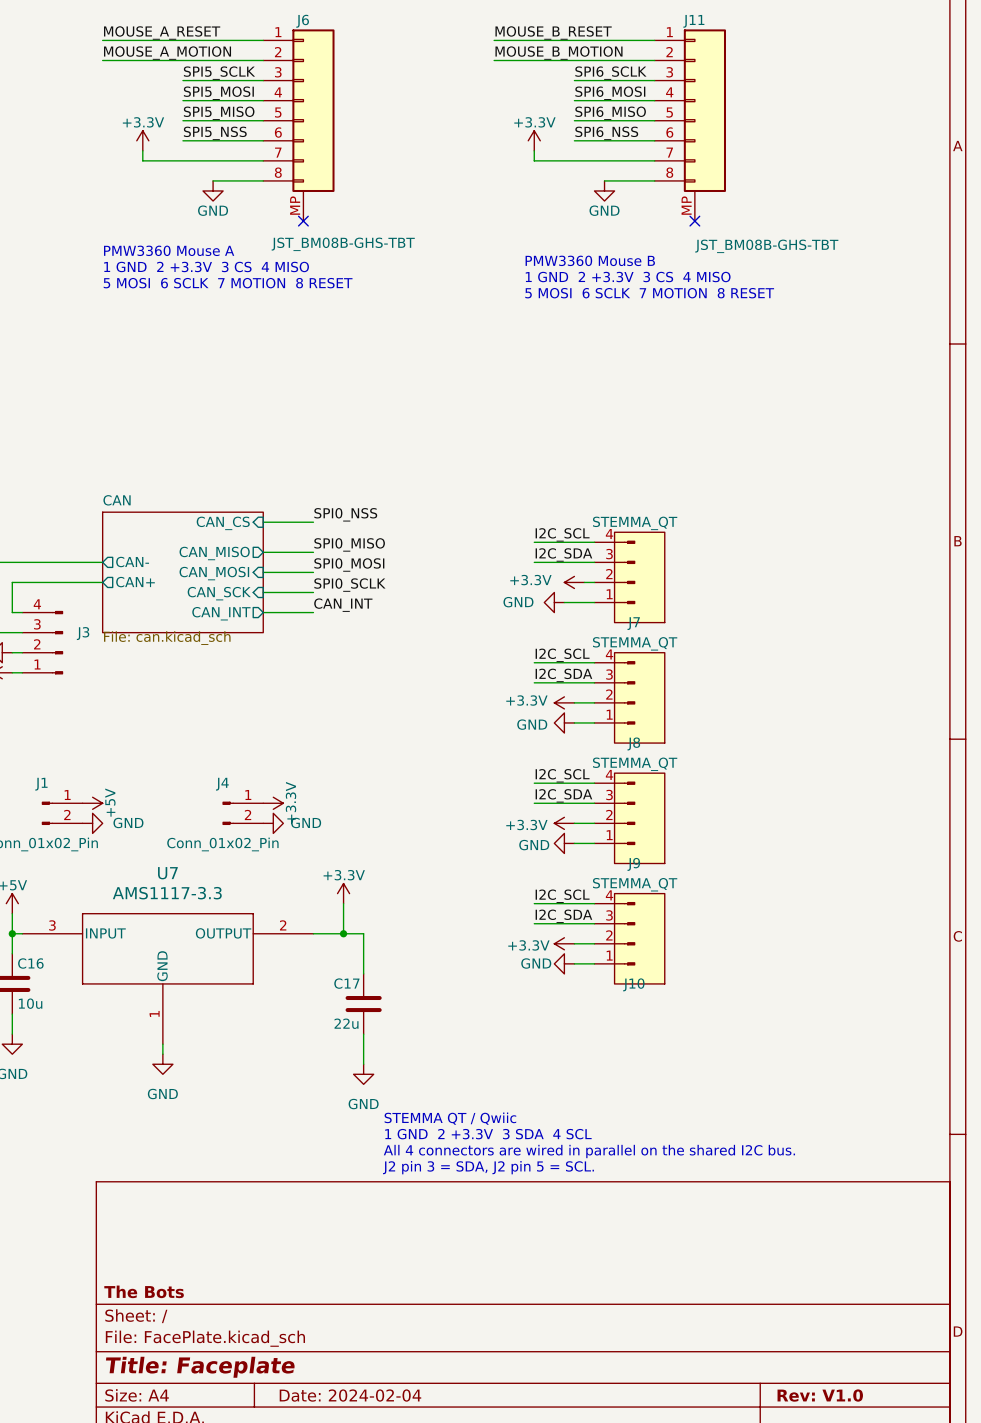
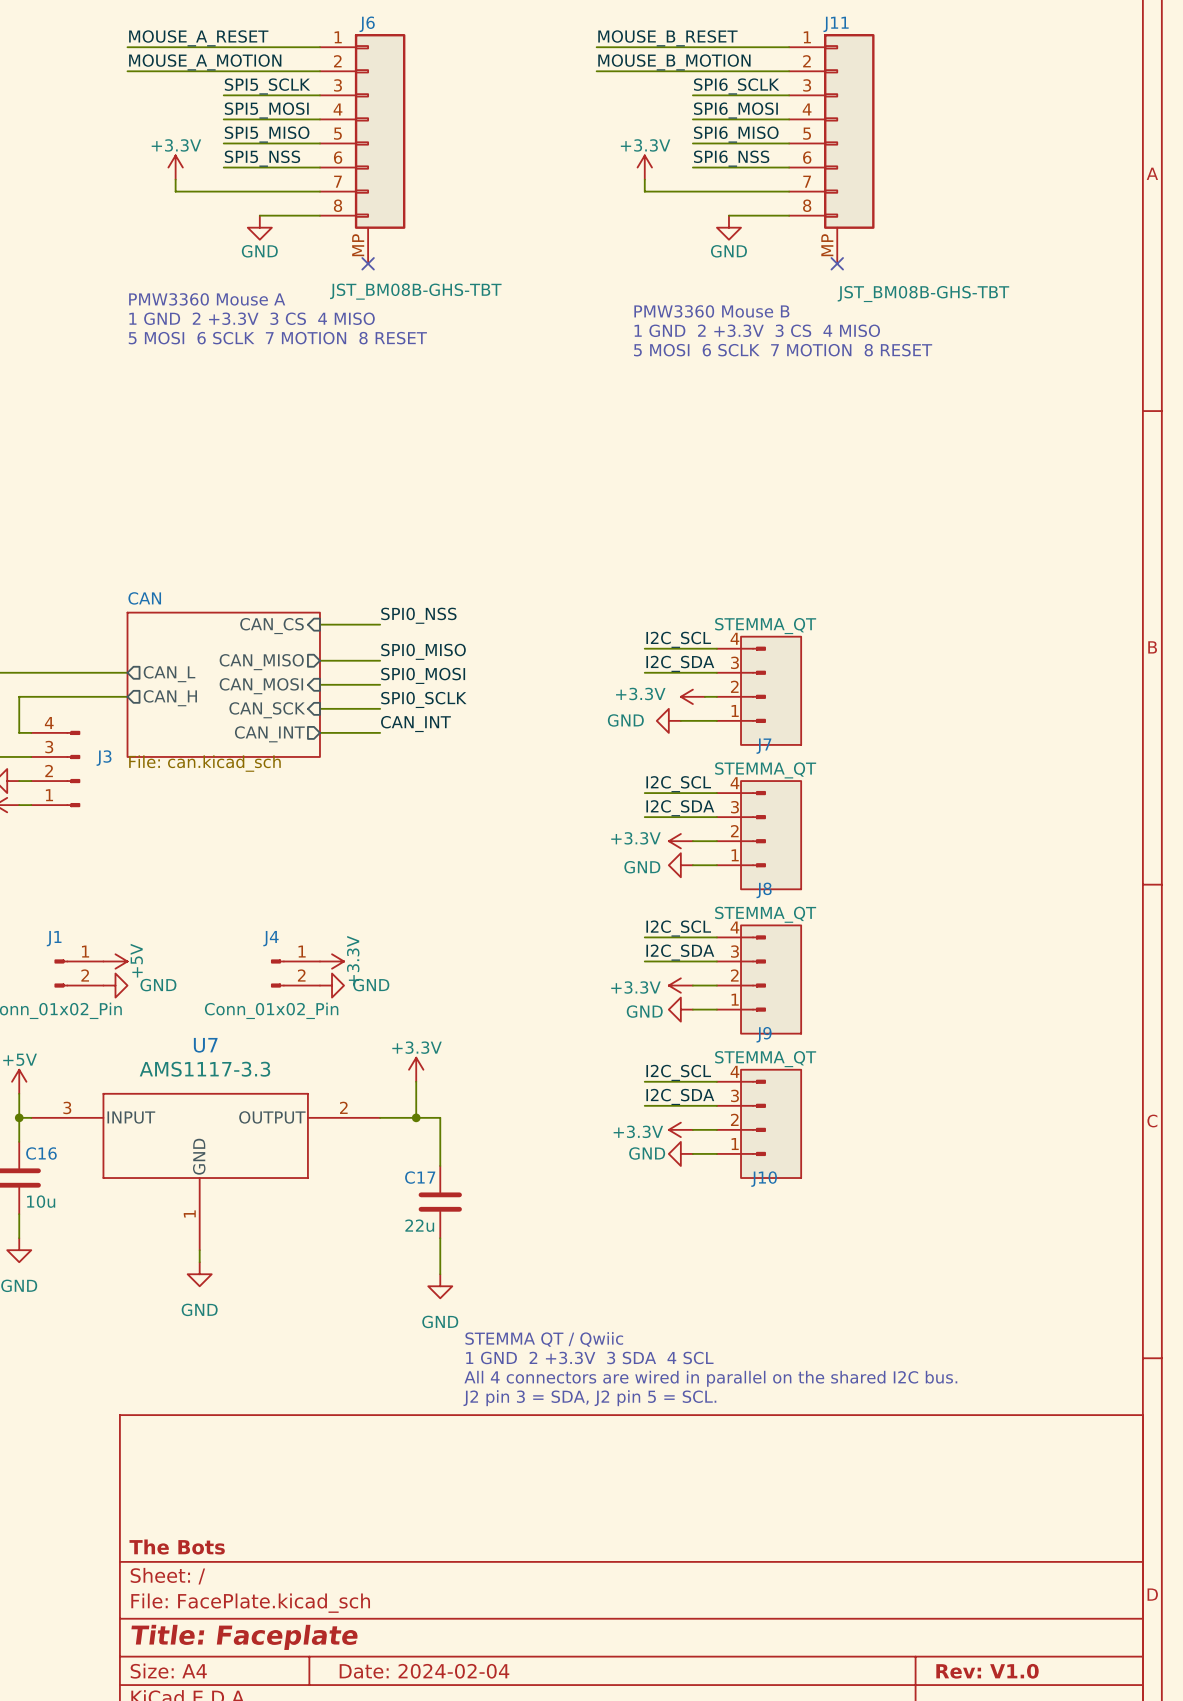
sheet pin: CAN- (132, 562) -> CAN_L (169, 674)
sheet pin: CAN+ (135, 582) -> CAN_H (170, 698)

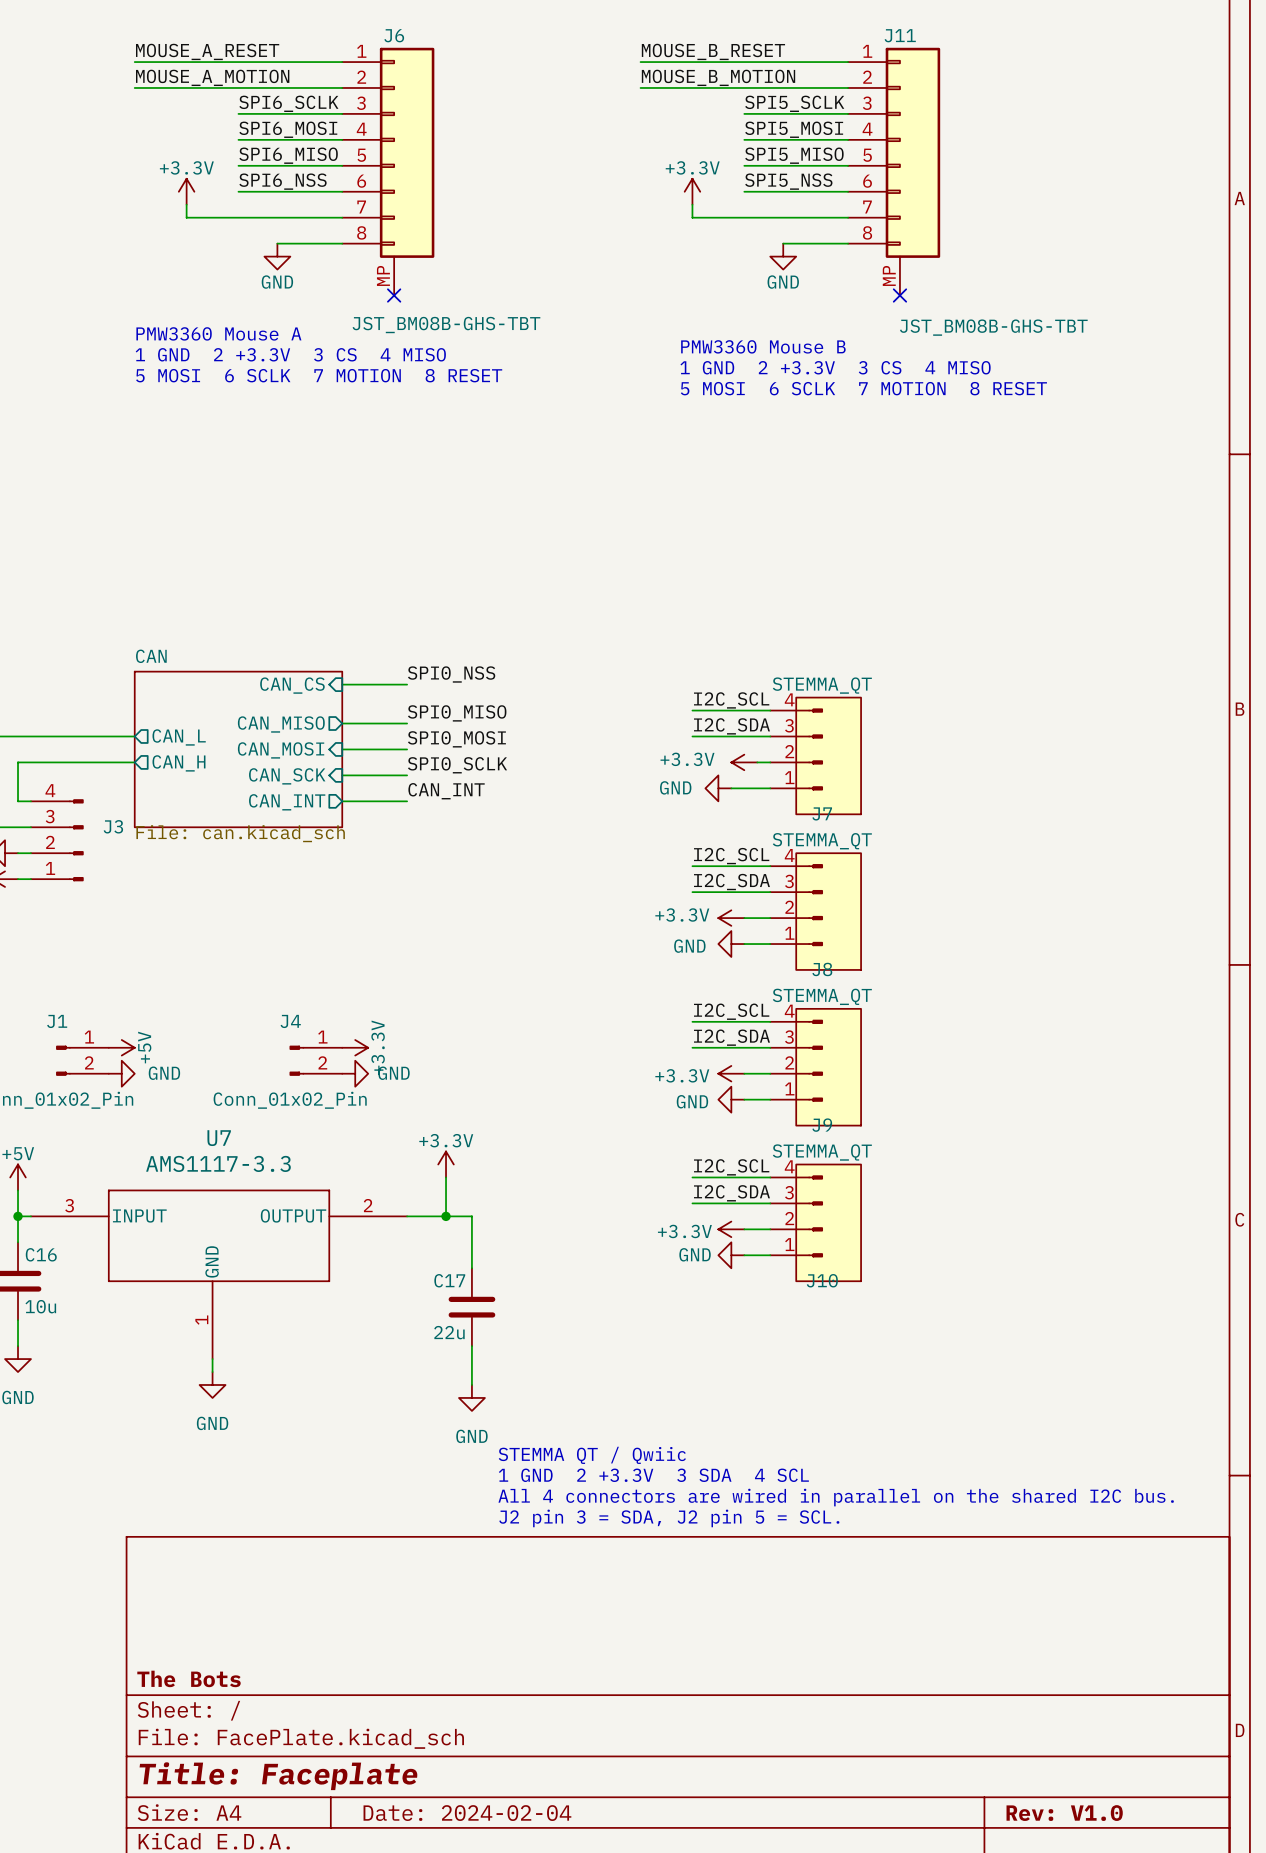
label: SPI5_SCLK (267, 86) -> SPI6_SCLK (288, 103)
label: SPI6_SCLK (736, 86) -> SPI5_SCLK (794, 103)
label: SPI5_MOSI (266, 110) -> SPI6_MOSI (288, 129)
label: SPI6_MOSI (735, 110) -> SPI5_MOSI (794, 129)
label: SPI5_MISO (267, 134) -> SPI6_MISO (288, 155)
label: SPI6_MISO (736, 134) -> SPI5_MISO (794, 155)
label: SPI5_NSS (262, 158) -> SPI6_NSS (282, 181)
label: SPI6_NSS (731, 158) -> SPI5_NSS (788, 181)

